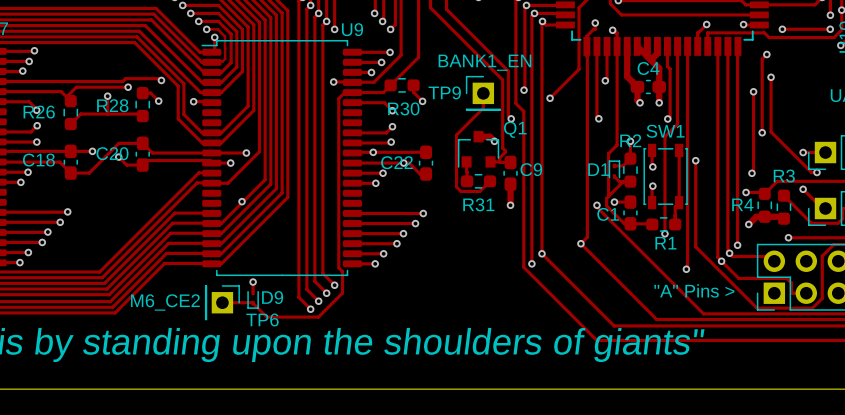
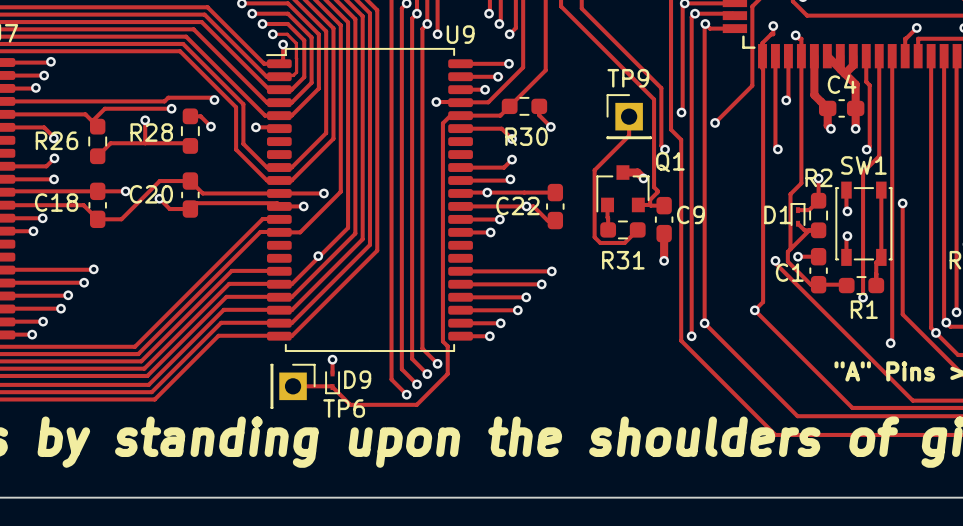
text: BANK1_EN (484, 62) -> none
TP9 name position: TP9 (444, 92) -> TP9 (628, 78)
text: M6_CE2 (165, 302) -> none

